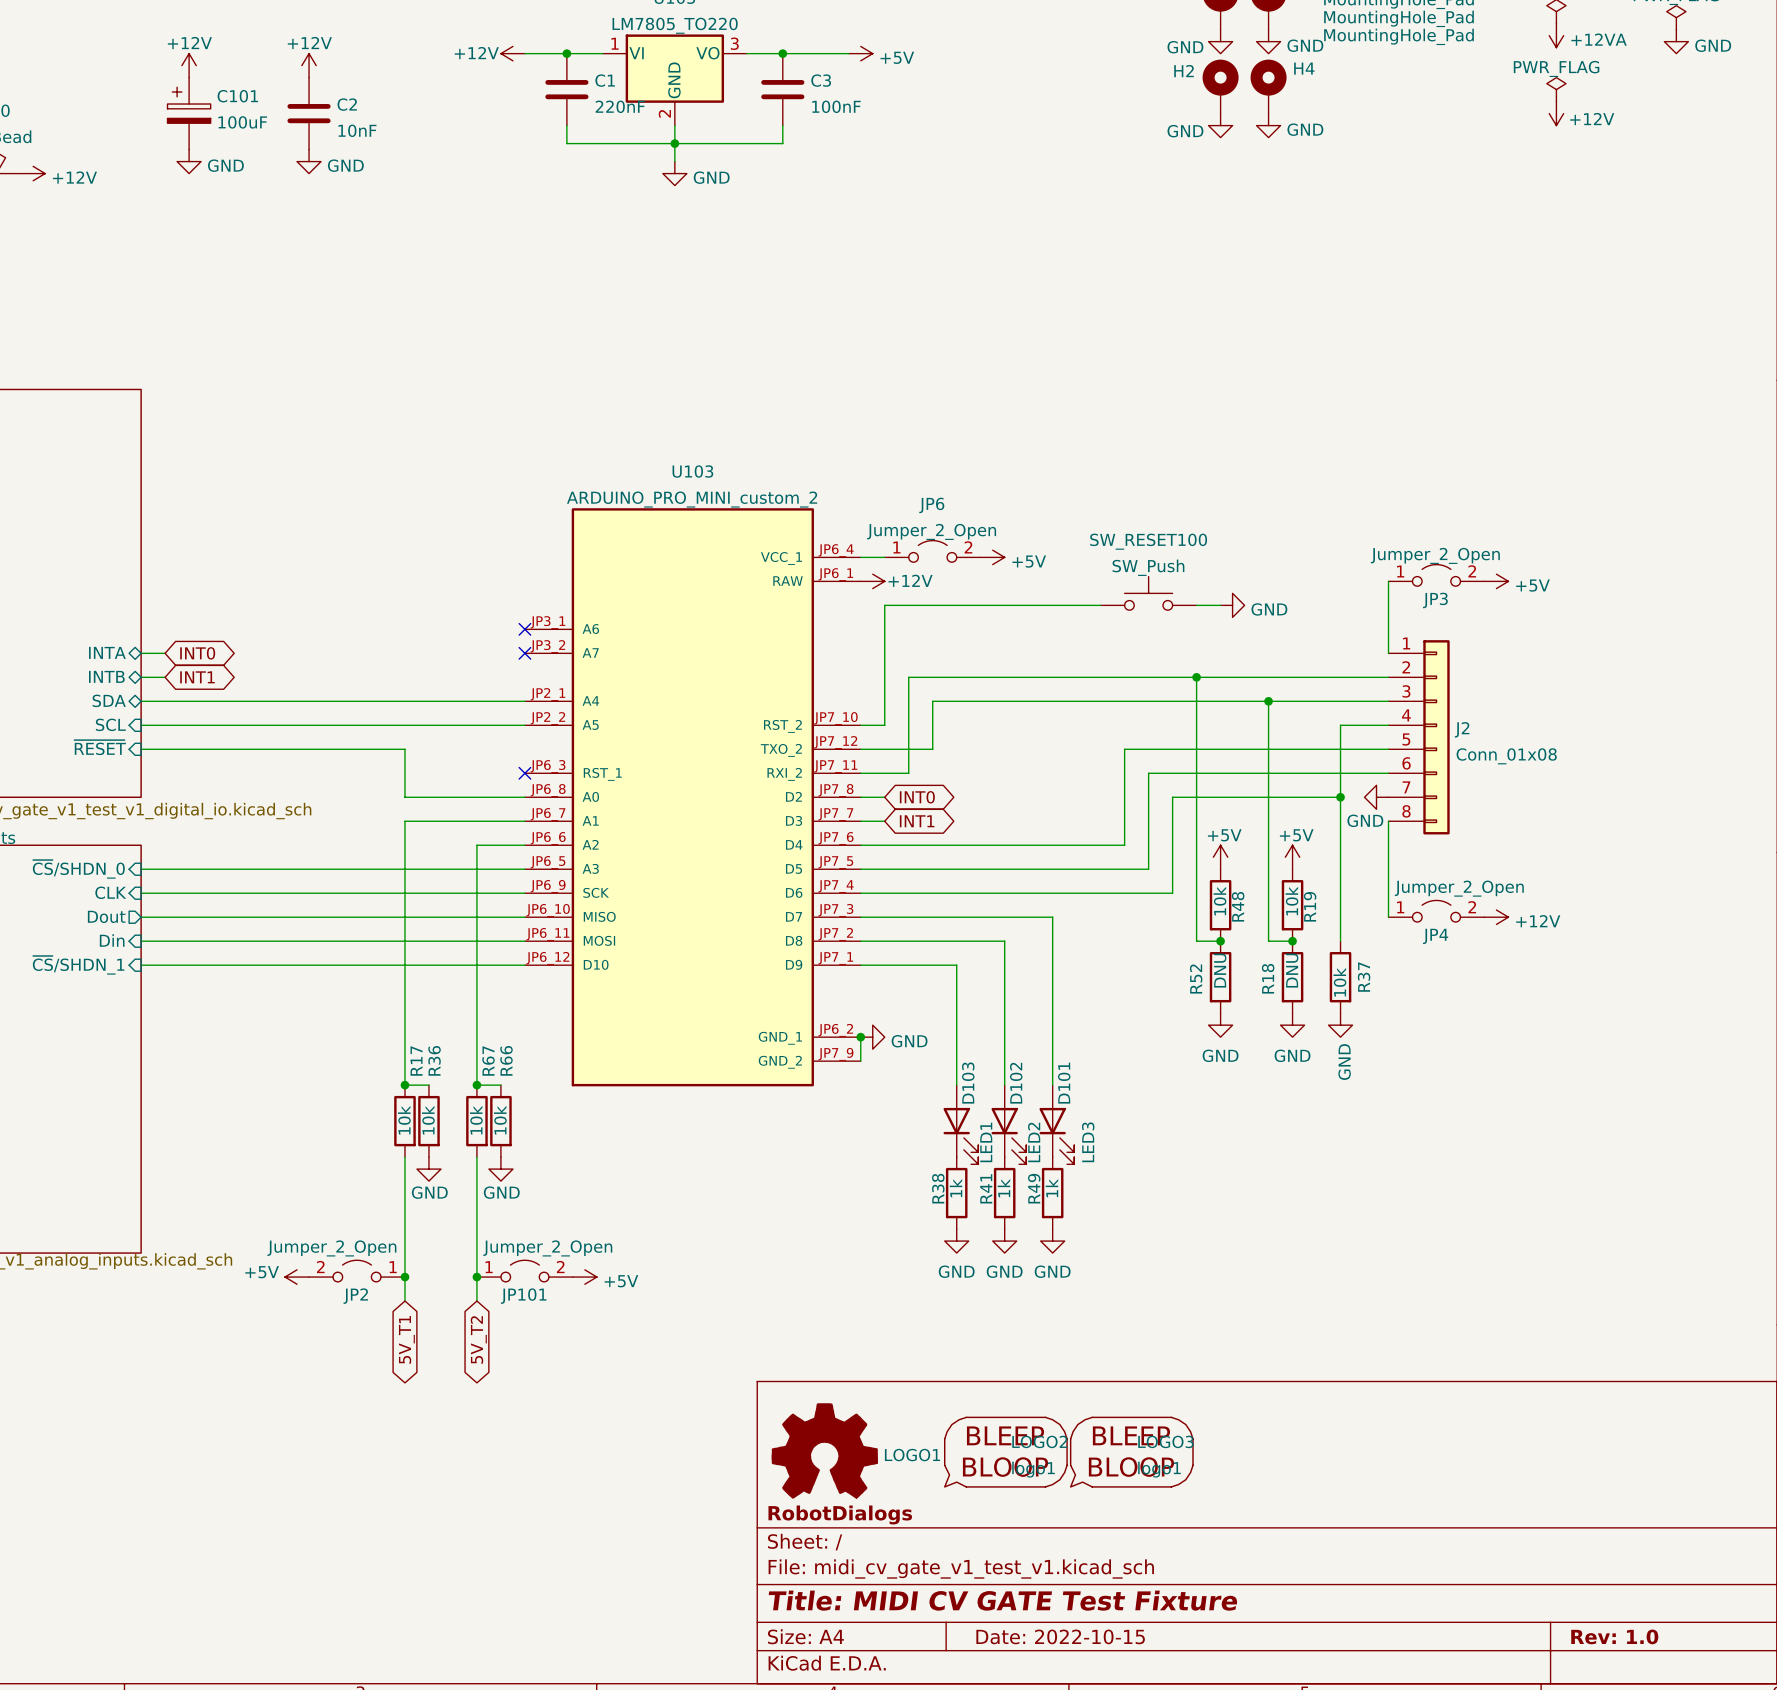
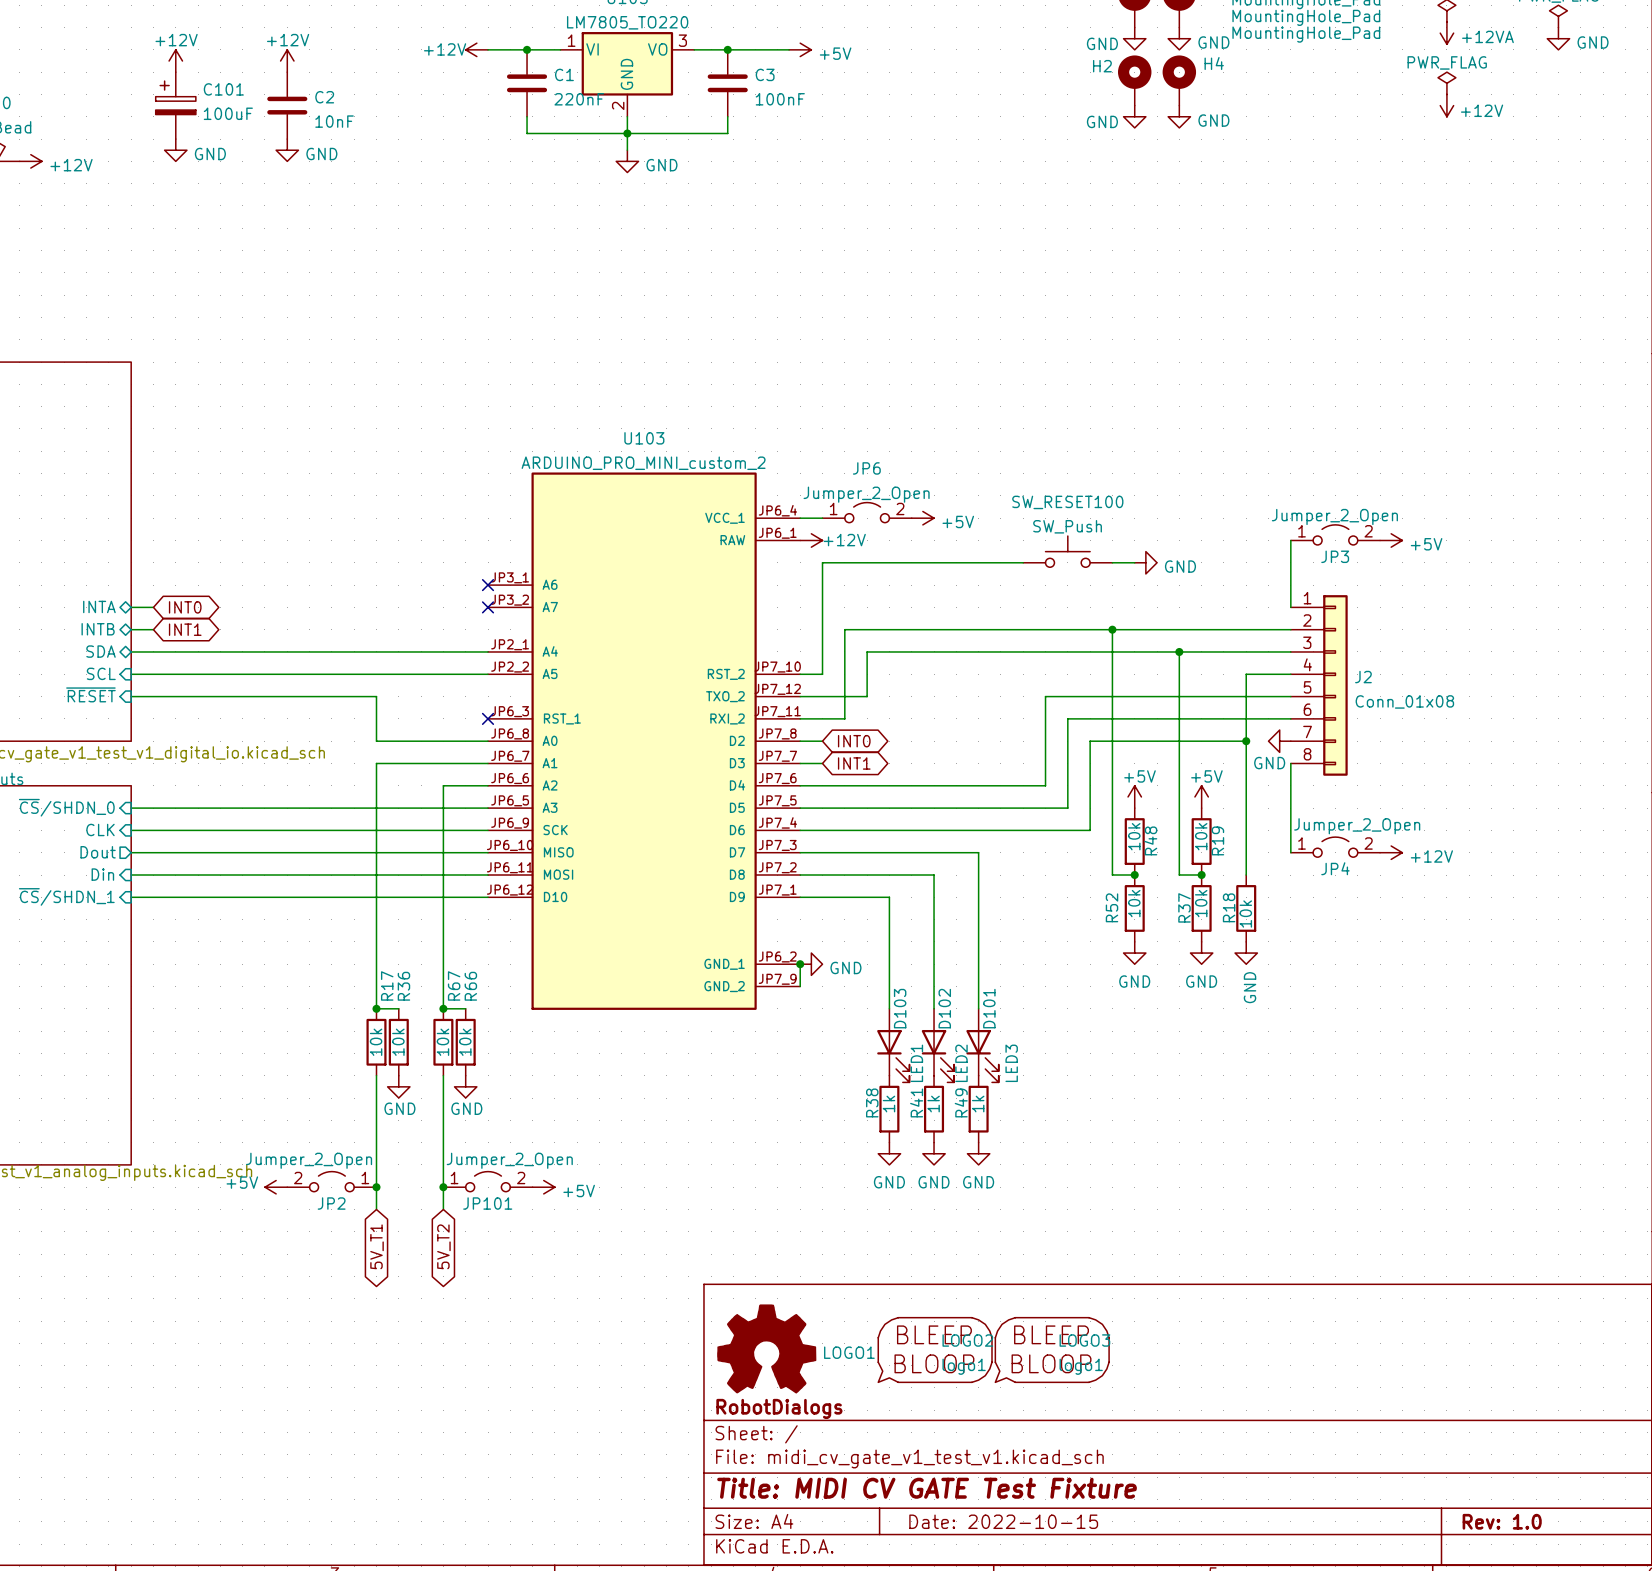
R52 value: DNU (1220, 970) -> 10k (1134, 903)
R18 value: DNU (1292, 970) -> 10k (1201, 903)
R37 name position: R37 (1364, 977) -> R37 (1184, 907)
R18 name position: R18 (1268, 978) -> R18 (1229, 907)

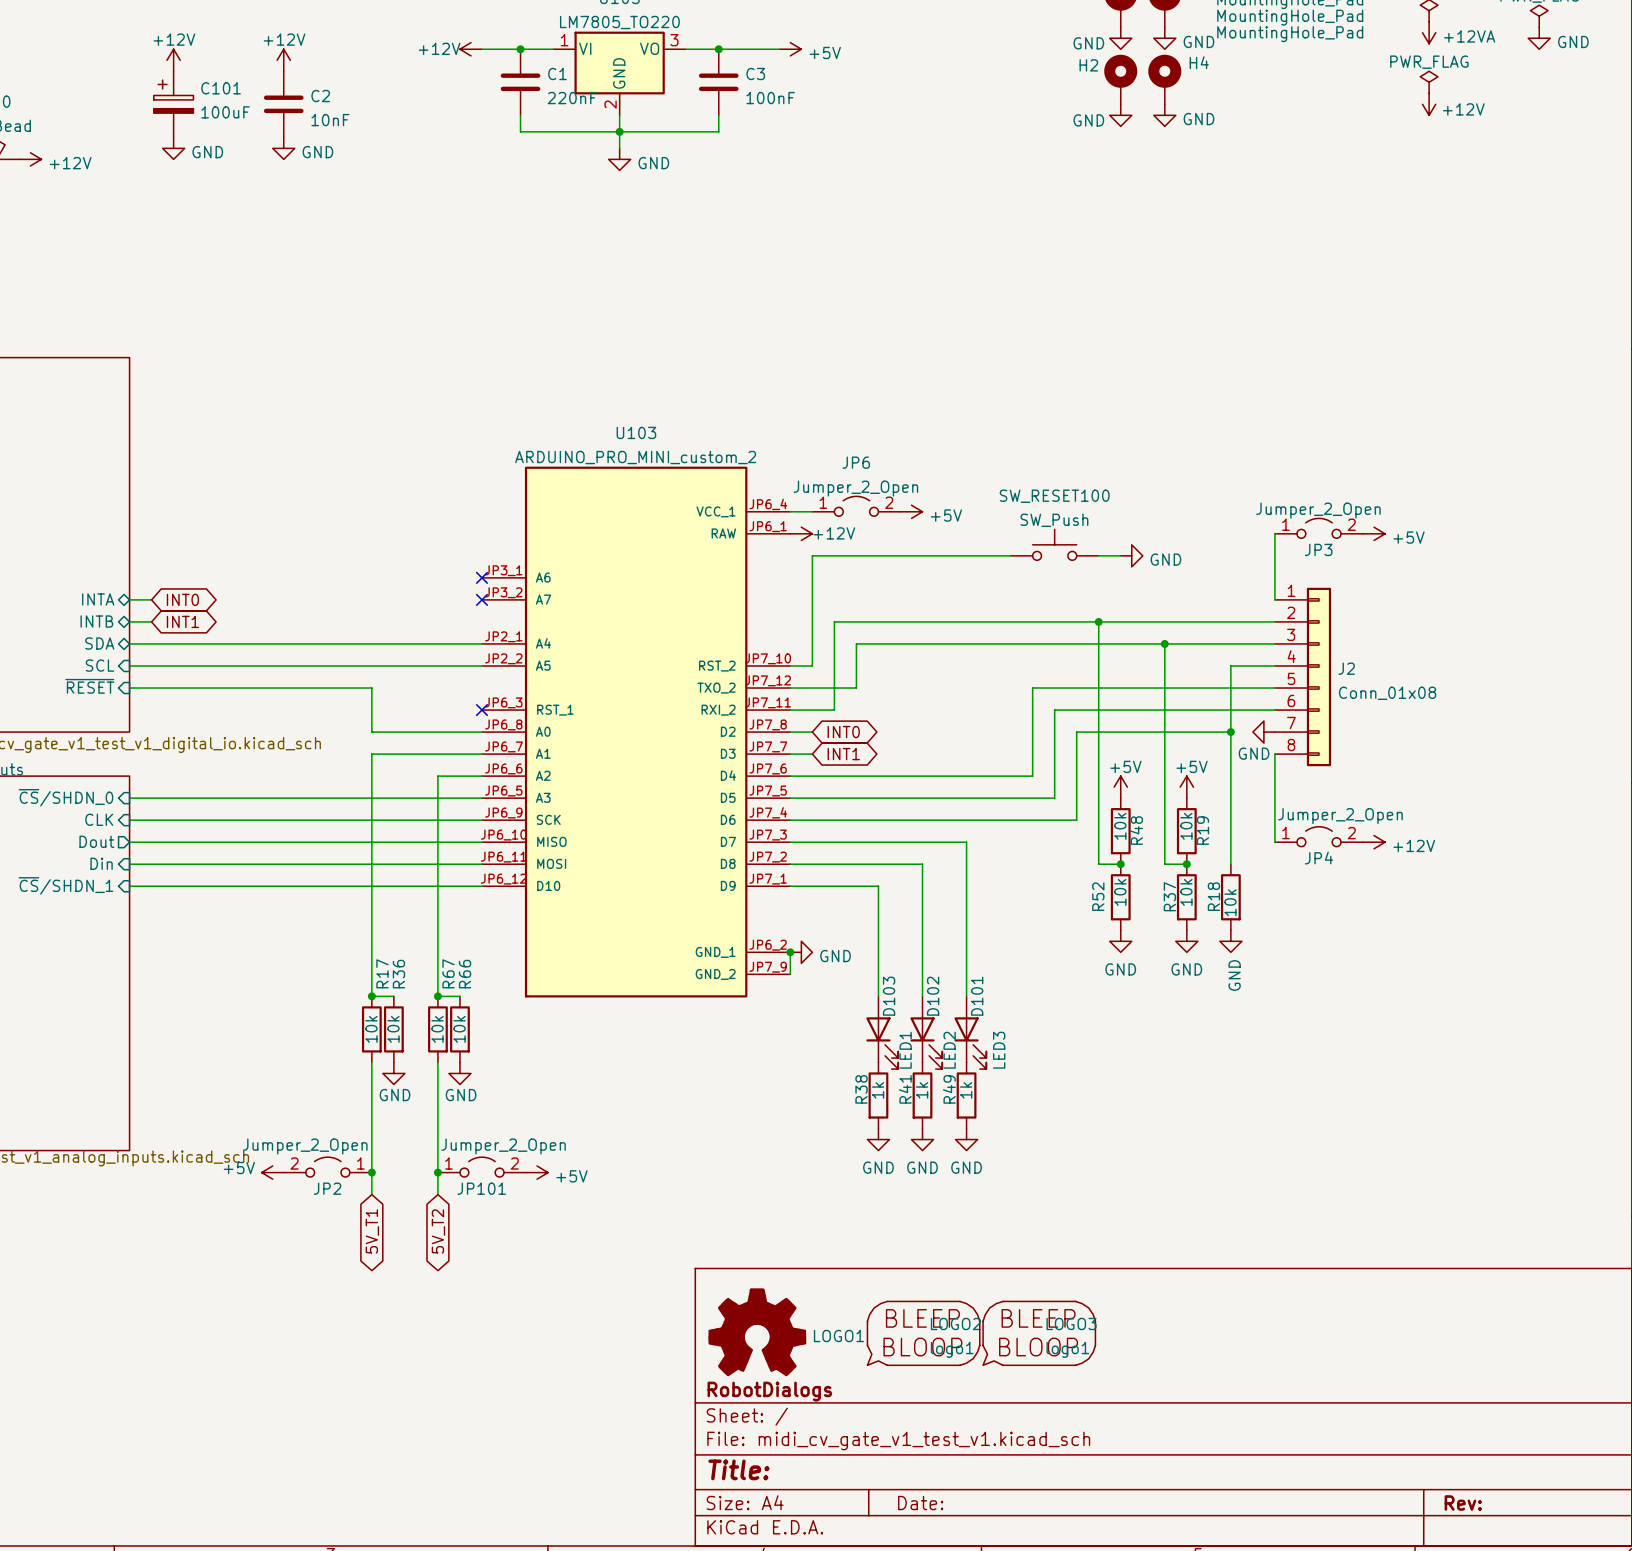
title block: Title: MIDI CV GATE Test Fixture (927, 1488) -> Title: (738, 1469)
title block: Date: 2022-10-15 (1003, 1521) -> Date: (920, 1503)
title block: Rev: 1.0 (1502, 1521) -> Rev: (1463, 1503)

